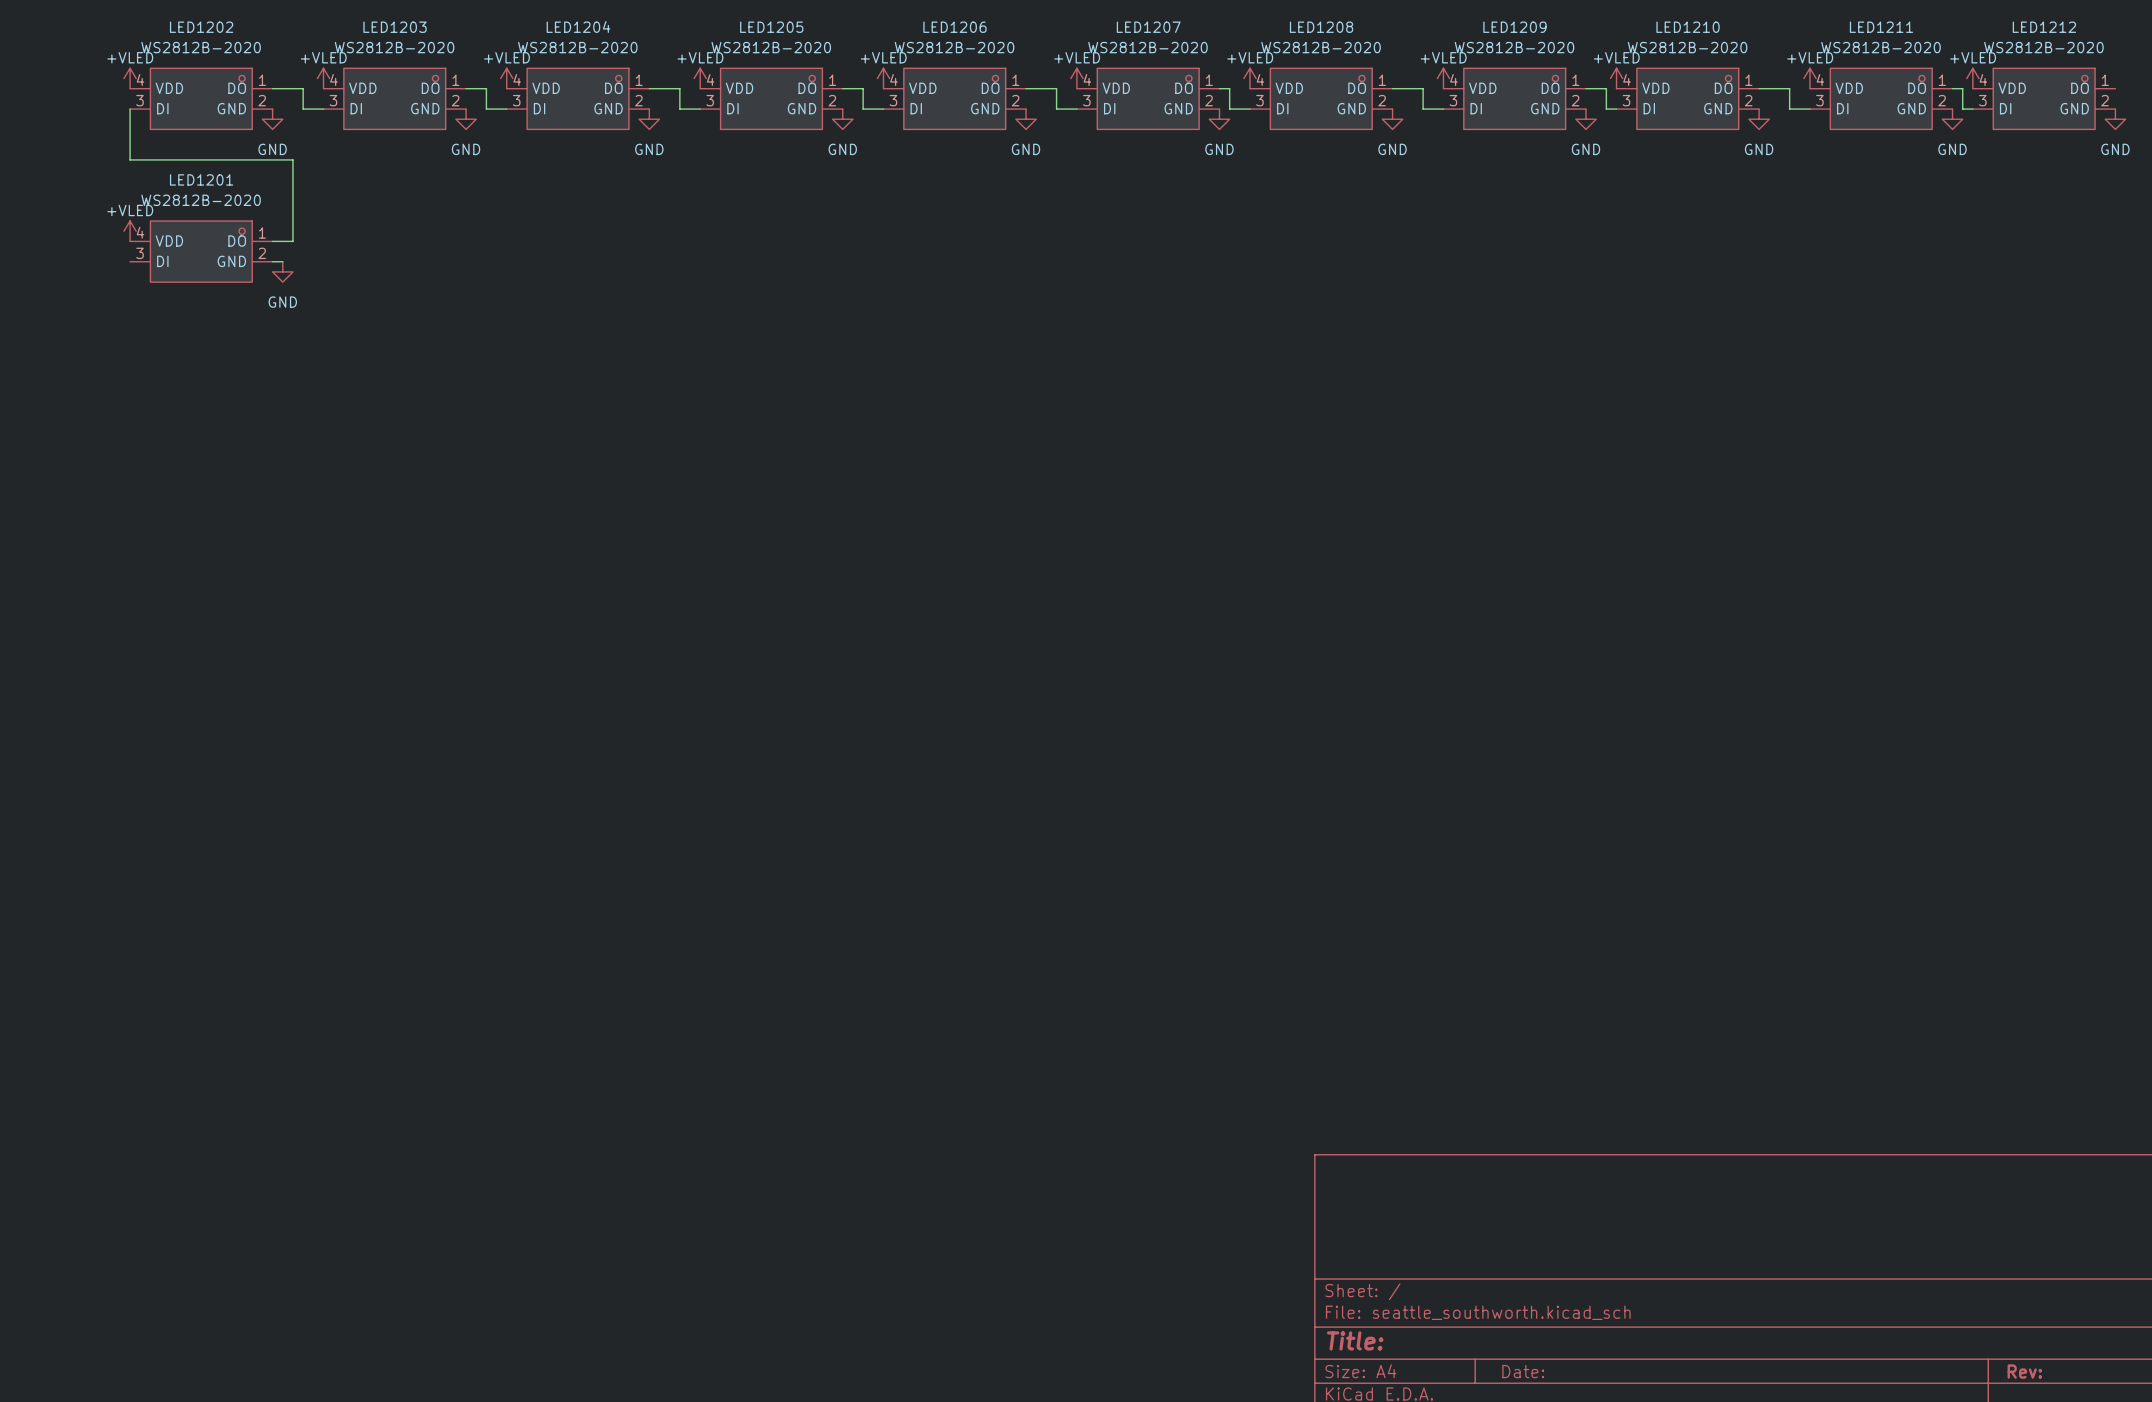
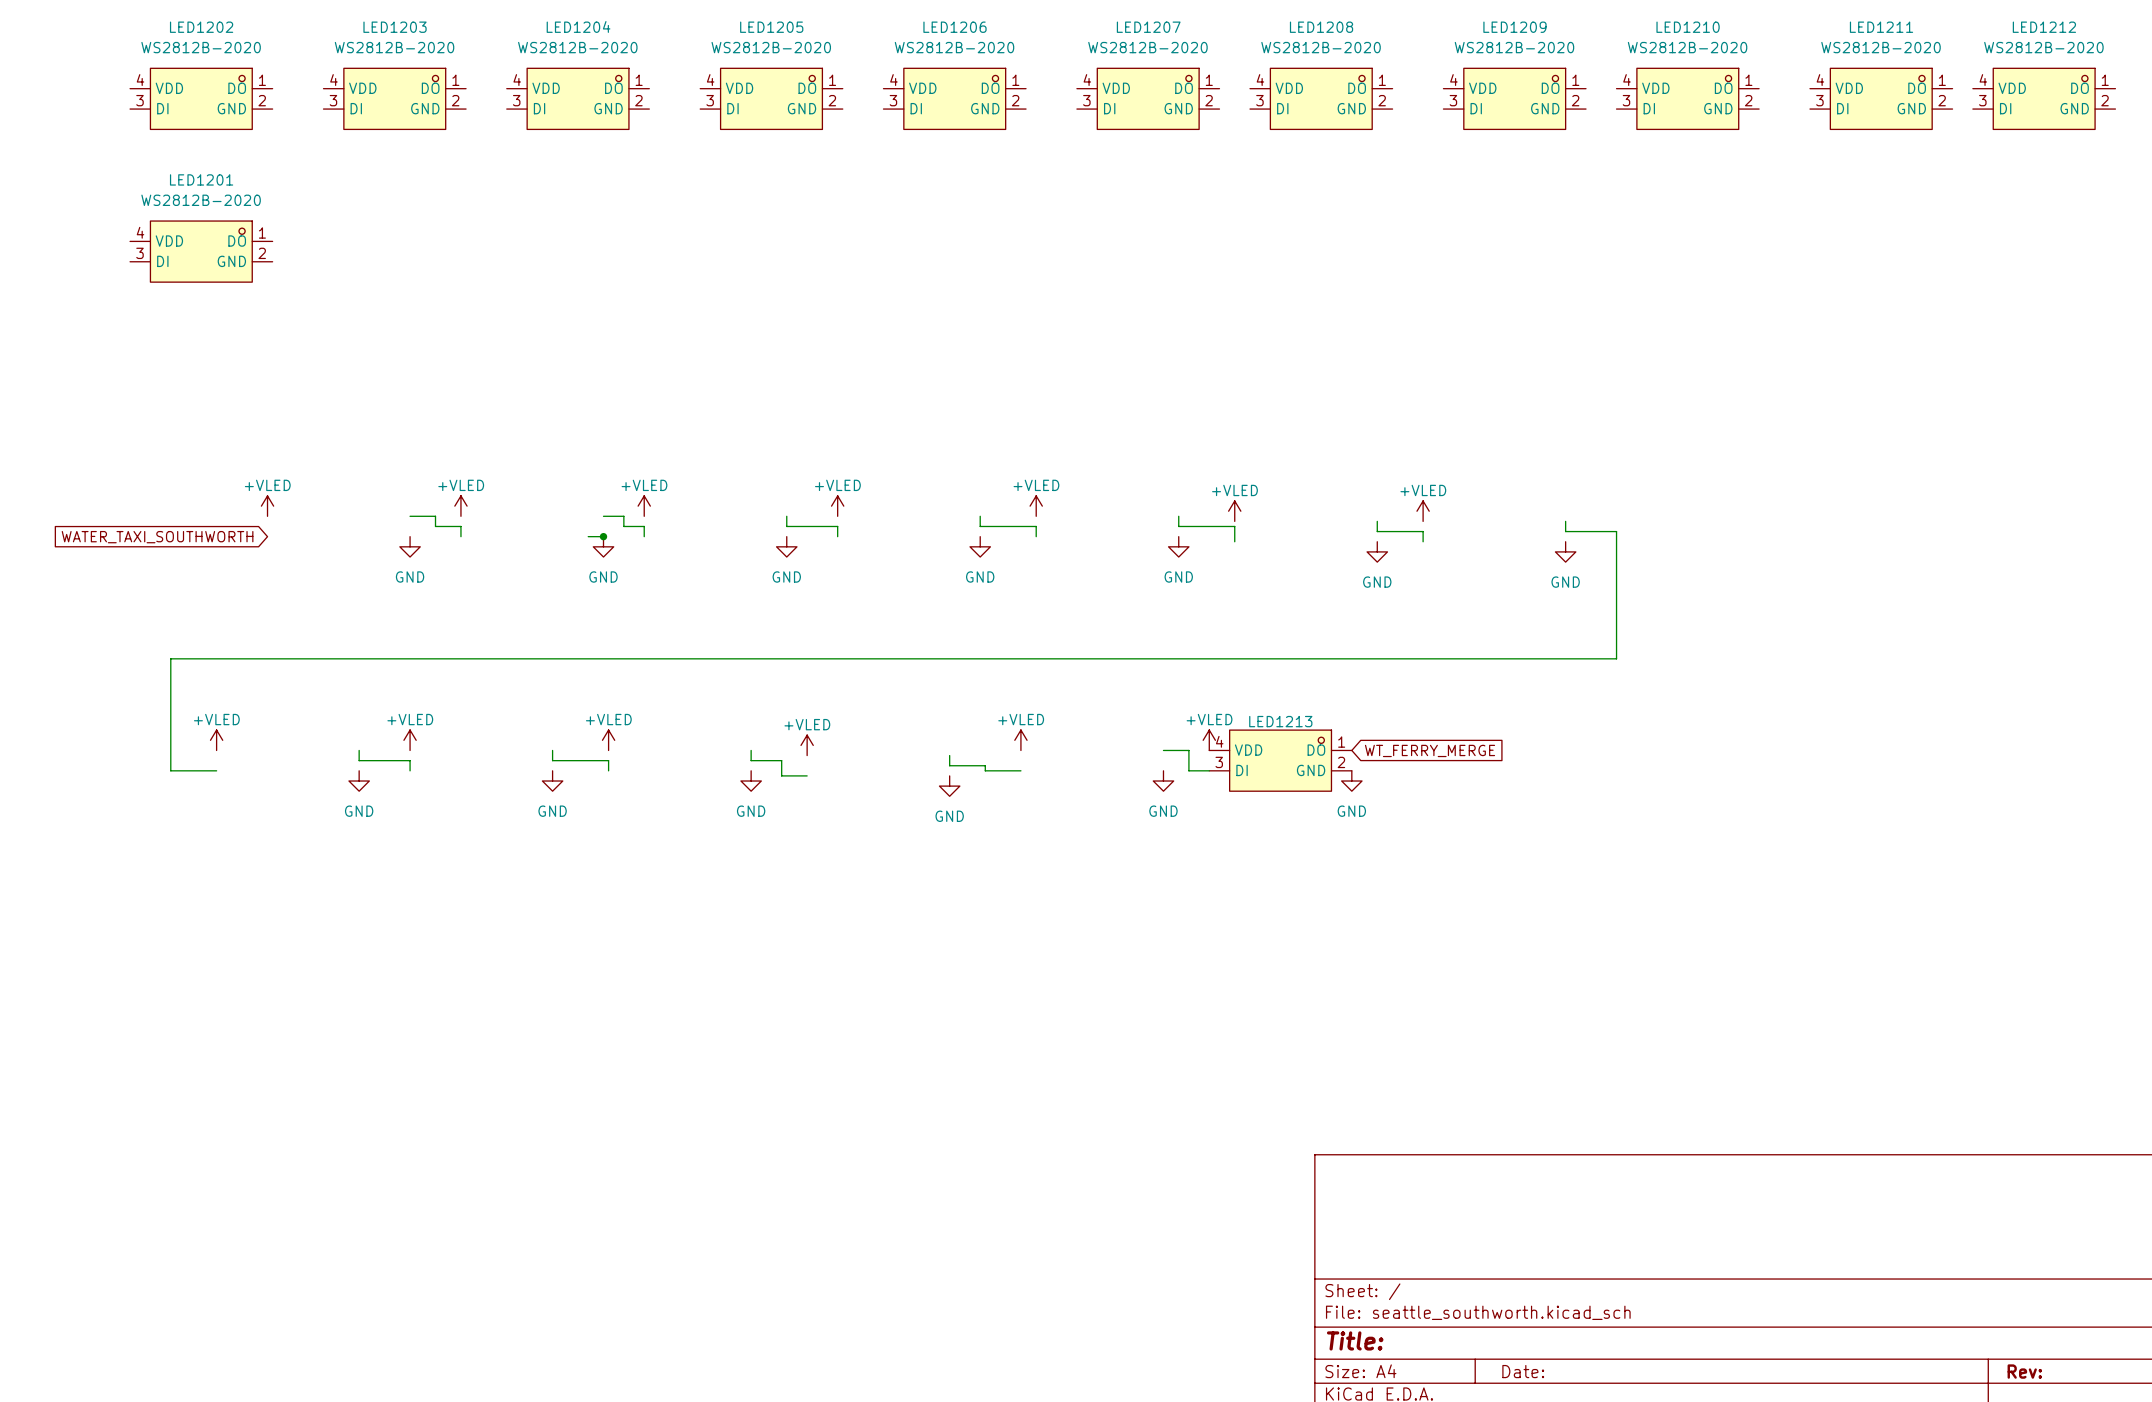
power symbol: +VLED (130, 78) -> none
power symbol: +VLED (323, 78) -> none
power symbol: +VLED (506, 78) -> none
power symbol: +VLED (700, 78) -> none
power symbol: +VLED (883, 78) -> none
power symbol: +VLED (1076, 78) -> none
power symbol: +VLED (1250, 78) -> none
power symbol: +VLED (1443, 78) -> none
power symbol: +VLED (1616, 78) -> none
power symbol: +VLED (1809, 78) -> none
power symbol: +VLED (1972, 78) -> none
wire: (272, 88) (303, 88) (303, 109) (323, 109) -> none
wire: (466, 88) (486, 88) (486, 109) (506, 109) -> none
wire: (649, 88) (679, 88) (679, 109) (700, 109) -> none
wire: (842, 88) (863, 88) (863, 109) (883, 109) -> none
wire: (1026, 88) (1056, 88) (1056, 109) (1076, 109) -> none
wire: (1219, 88) (1229, 88) (1229, 109) (1250, 109) -> none
wire: (1392, 88) (1423, 88) (1423, 109) (1443, 109) -> none
wire: (1586, 88) (1606, 88) (1606, 109) (1616, 109) -> none
wire: (1759, 88) (1789, 88) (1789, 109) (1809, 109) -> none
wire: (1952, 88) (1962, 88) (1962, 109) (1972, 109) -> none
wire: (130, 109) (130, 159) (292, 159) (292, 241) (272, 241) -> none
power symbol: GND (272, 119) -> none
power symbol: GND (466, 119) -> none
power symbol: GND (649, 119) -> none
power symbol: GND (842, 119) -> none
power symbol: GND (1026, 119) -> none
power symbol: GND (1219, 119) -> none
power symbol: GND (1392, 119) -> none
power symbol: GND (1586, 119) -> none
power symbol: GND (1759, 119) -> none
power symbol: GND (1952, 119) -> none
power symbol: GND (2115, 119) -> none
power symbol: +VLED (130, 231) -> none
wire: (272, 261) (282, 261) -> none
power symbol: GND (282, 271) -> none
power symbol: none -> +VLED (267, 506)
power symbol: none -> +VLED (460, 506)
power symbol: none -> +VLED (644, 506)
power symbol: none -> +VLED (837, 506)
power symbol: none -> +VLED (1036, 506)
power symbol: none -> +VLED (1234, 511)
power symbol: none -> +VLED (1423, 511)
wire: none -> (410, 516) (435, 516) (435, 526) (460, 526) (460, 536)
wire: none -> (603, 516) (623, 516) (623, 526) (644, 526) (644, 536)
wire: none -> (786, 516) (786, 526) (837, 526) (837, 536)
wire: none -> (980, 516) (980, 526) (1036, 526) (1036, 536)
wire: none -> (1178, 516) (1178, 526) (1234, 526) (1234, 541)
wire: none -> (1377, 521) (1377, 531) (1423, 531) (1423, 541)
wire: none -> (1565, 521) (1565, 531) (1616, 531) (1616, 658) (170, 658) (170, 770) (216, 770)
wire: none -> (588, 536) (603, 536)
junction: none -> (603, 536)
global label: none -> WATER_TAXI_SOUTHWORTH (157, 537)
power symbol: none -> GND (410, 546)
power symbol: none -> GND (603, 546)
power symbol: none -> GND (786, 546)
power symbol: none -> GND (980, 546)
power symbol: none -> GND (1178, 546)
power symbol: none -> GND (1377, 551)
power symbol: none -> GND (1565, 551)
power symbol: none -> +VLED (216, 740)
power symbol: none -> +VLED (410, 740)
power symbol: none -> +VLED (608, 740)
power symbol: none -> +VLED (1020, 740)
power symbol: none -> +VLED (1209, 740)
power symbol: none -> +VLED (807, 745)
wire: none -> (359, 750) (359, 760) (410, 760) (410, 770)
wire: none -> (552, 750) (552, 760) (608, 760) (608, 770)
wire: none -> (751, 750) (751, 760) (781, 760) (781, 775) (807, 775)
wire: none -> (1163, 750) (1188, 750) (1188, 770) (1209, 770)
global label: none -> WT_FERRY_MERGE (1430, 750)
wire: none -> (949, 755) (949, 765) (985, 765) (985, 770) (1020, 770)
LED1213: none -> (1280, 760)
power symbol: none -> GND (359, 781)
power symbol: none -> GND (552, 781)
power symbol: none -> GND (751, 781)
power symbol: none -> GND (1163, 781)
power symbol: none -> GND (1351, 781)
power symbol: none -> GND (949, 786)

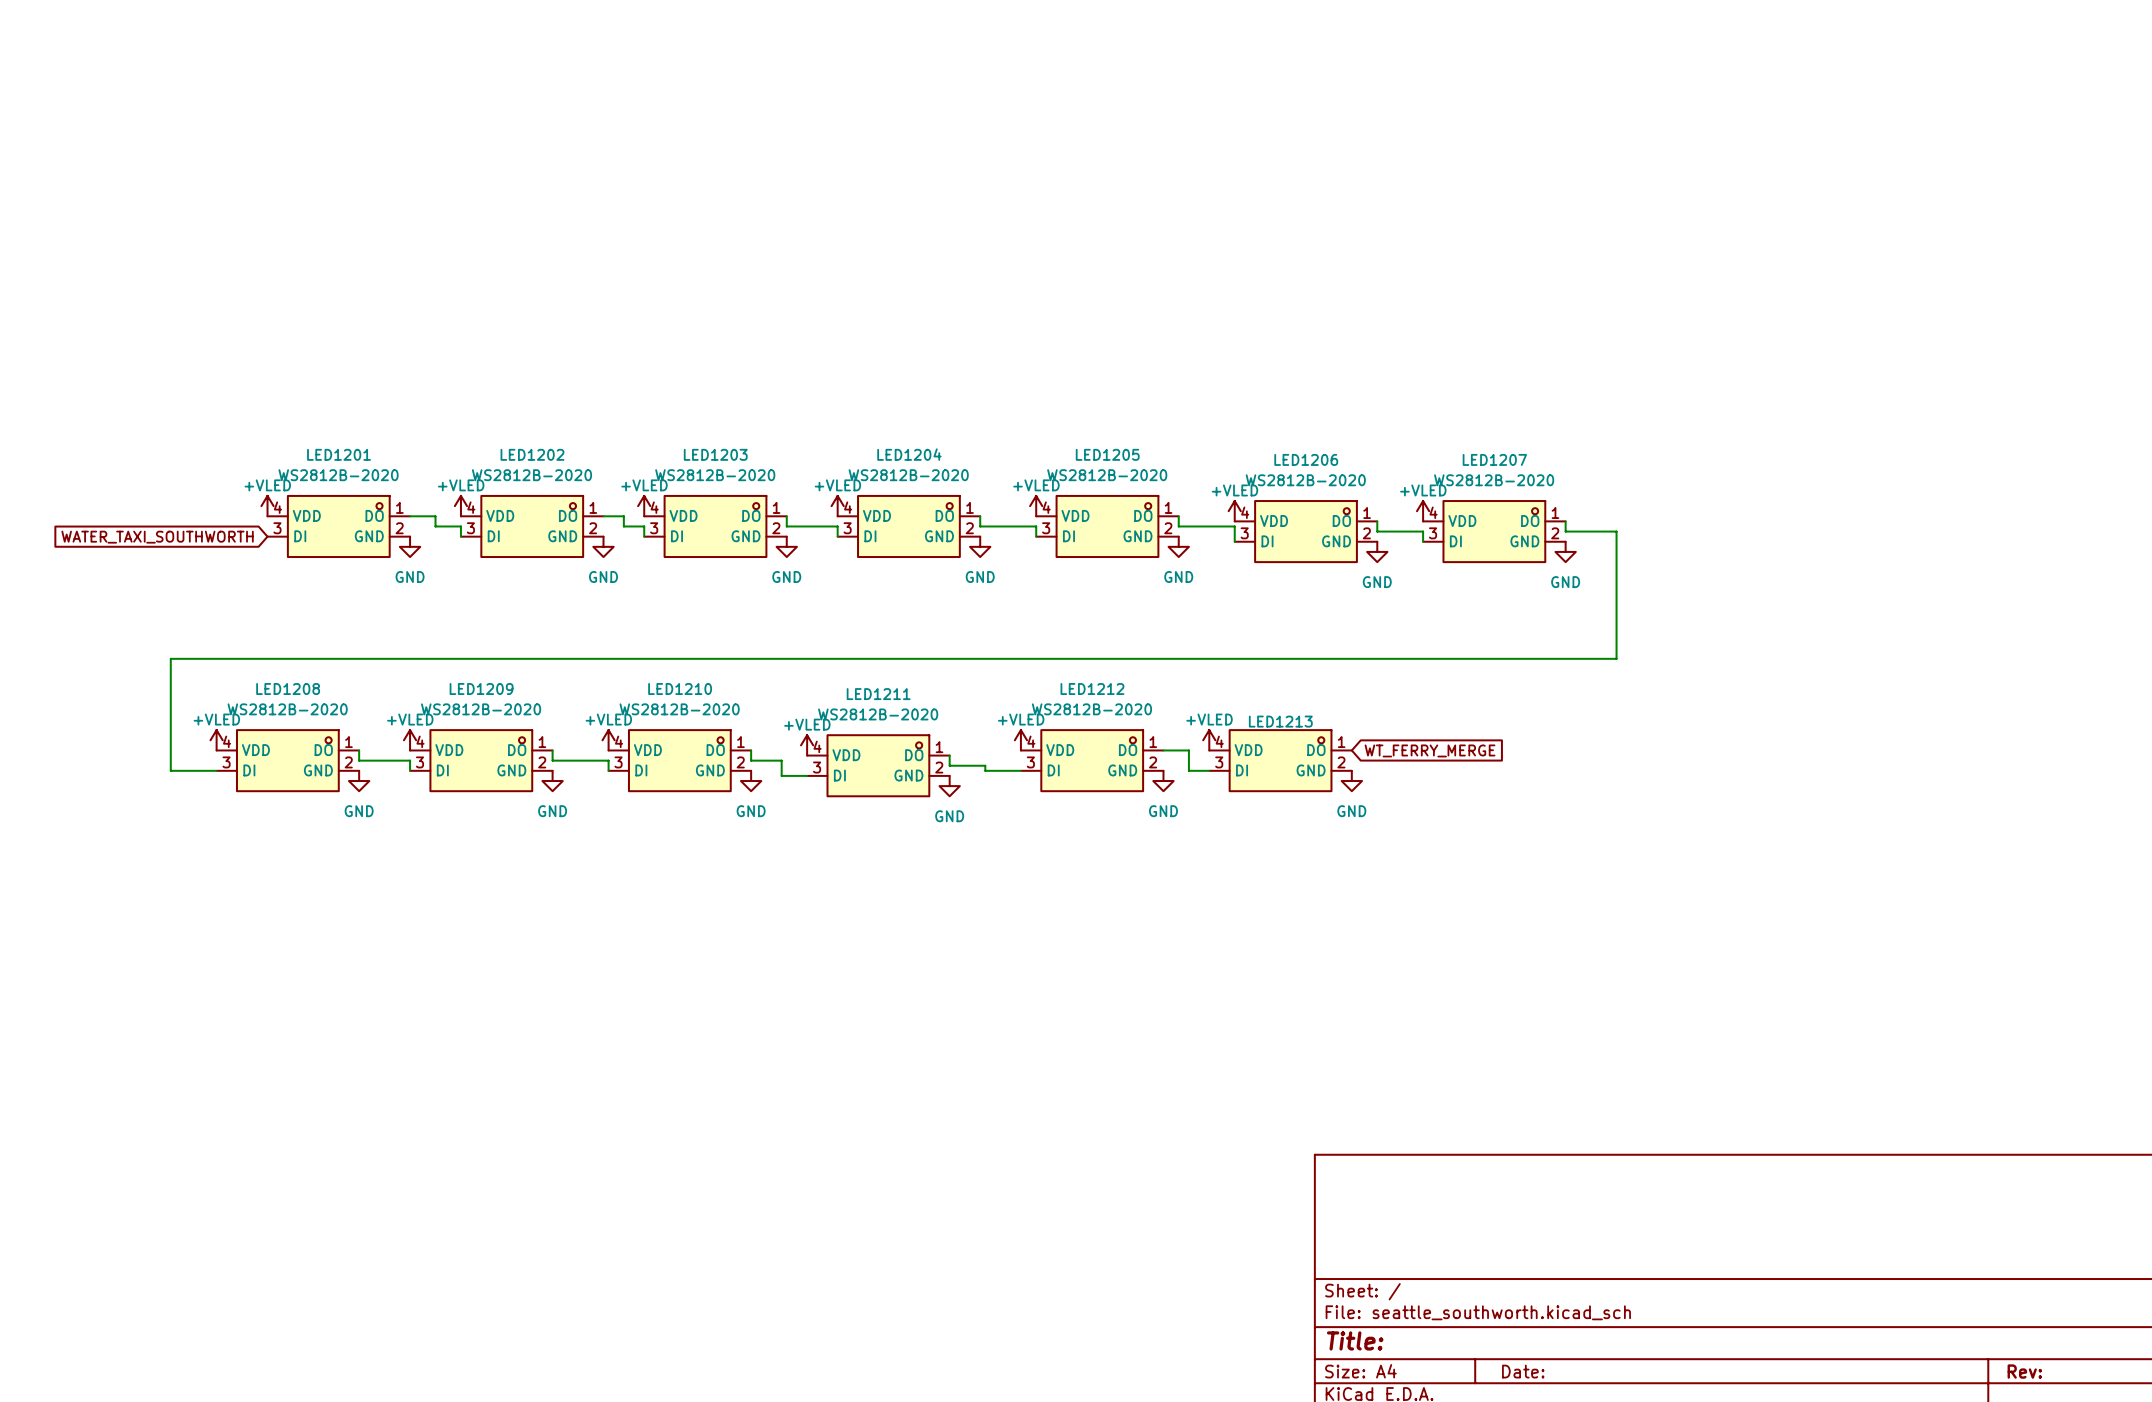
LED1202 position: (201, 98) -> (532, 526)
LED1203 position: (394, 98) -> (715, 526)
LED1204 position: (578, 98) -> (908, 526)
LED1205 position: (771, 98) -> (1107, 526)
LED1206 position: (954, 98) -> (1306, 531)
LED1207 position: (1148, 98) -> (1494, 531)
LED1208 position: (1321, 98) -> (287, 760)
LED1209 position: (1514, 98) -> (481, 760)
LED1210 position: (1687, 98) -> (679, 760)
LED1211 position: (1881, 98) -> (878, 765)
LED1212 position: (2044, 98) -> (1092, 760)
LED1201 position: (201, 251) -> (338, 526)
junction: (603, 536) -> none

